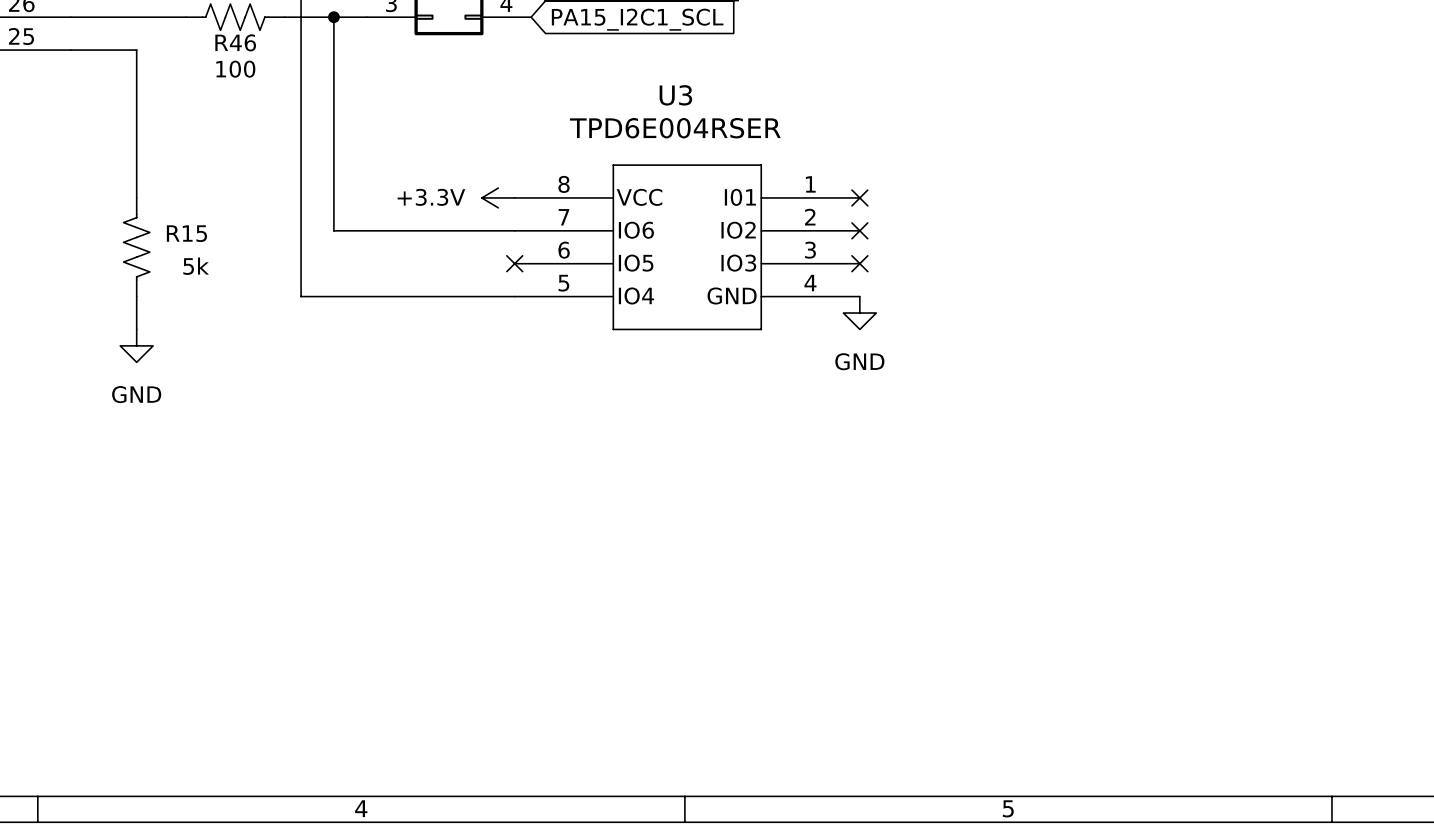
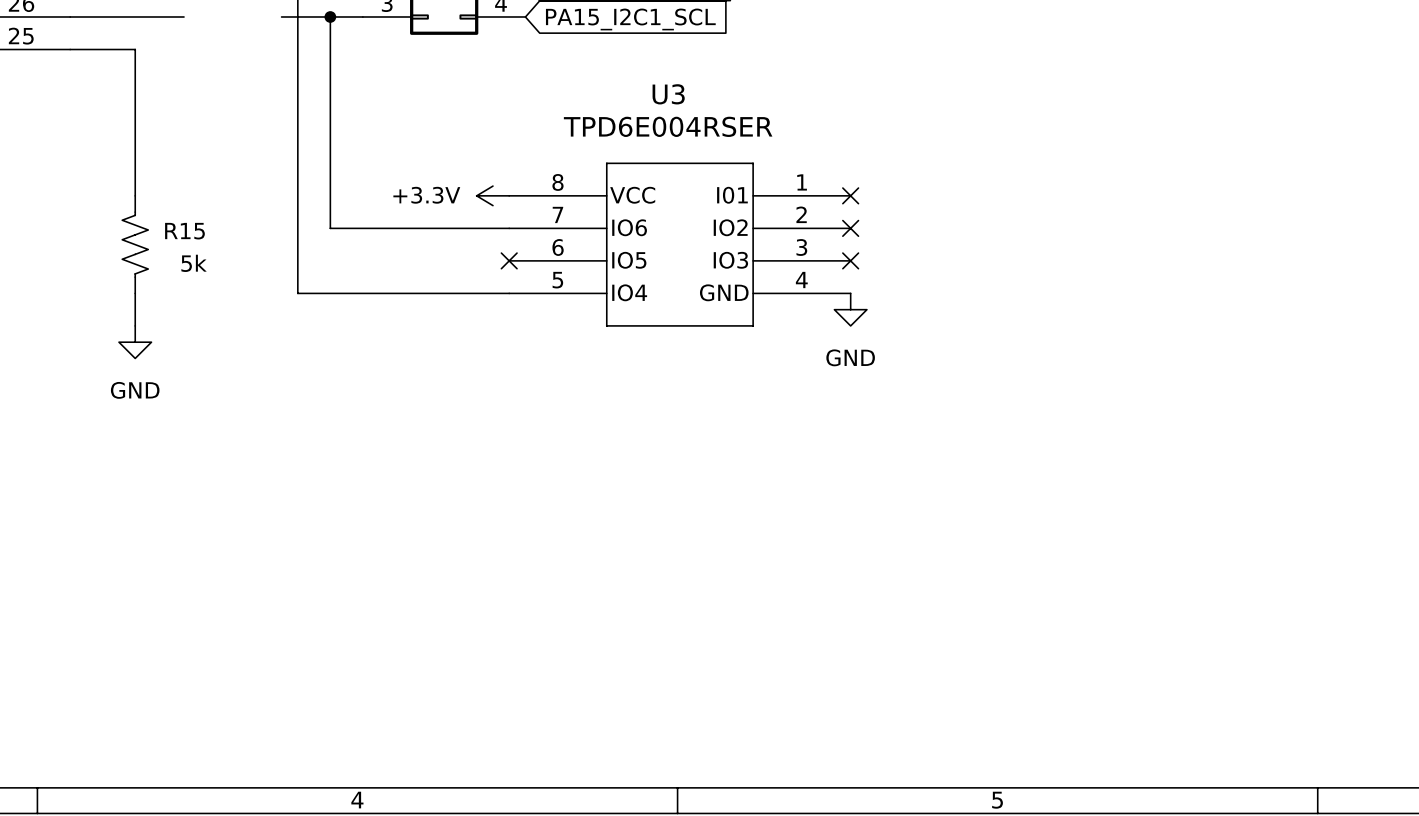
R46: 100 (235, 17) -> none

